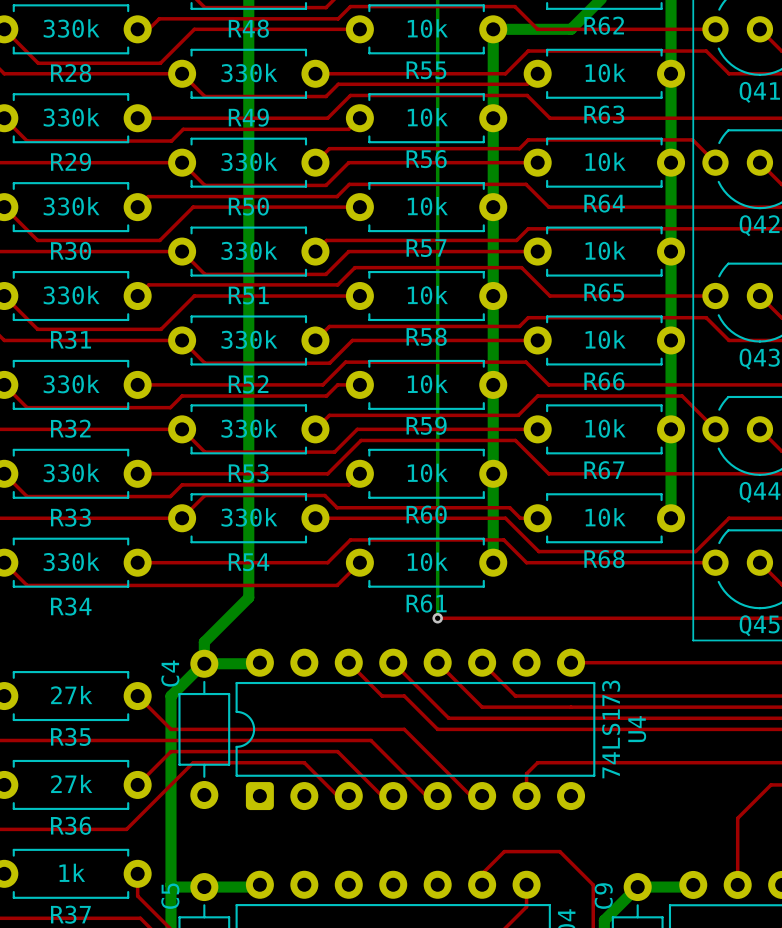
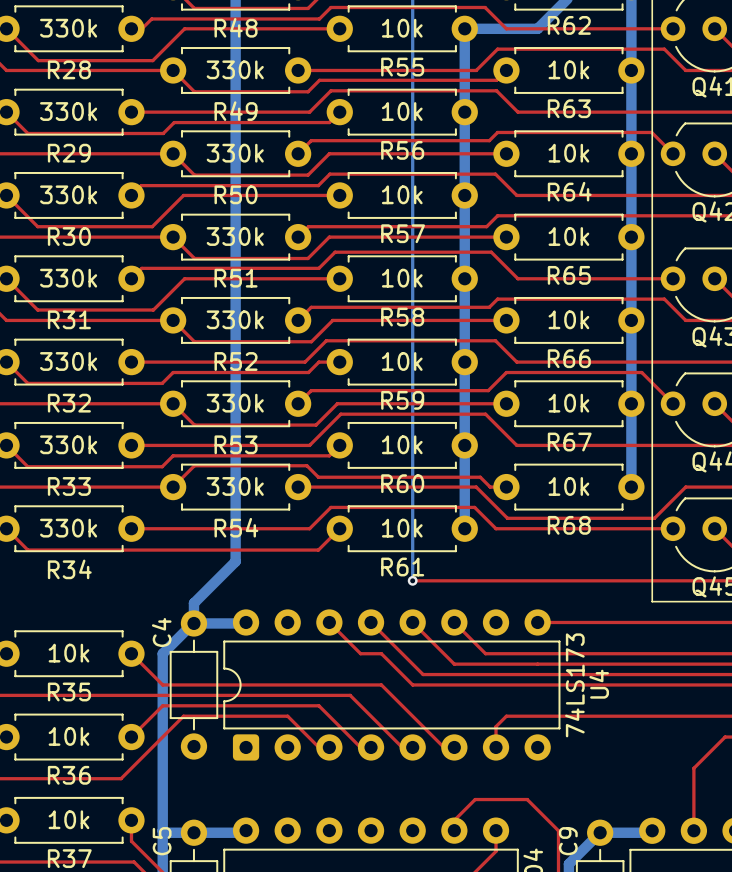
R35 value: 27k (71, 695) -> 10k (68, 653)
R36 value: 27k (71, 783) -> 10k (68, 736)
R37 value: 1k (72, 872) -> 10k (68, 819)

